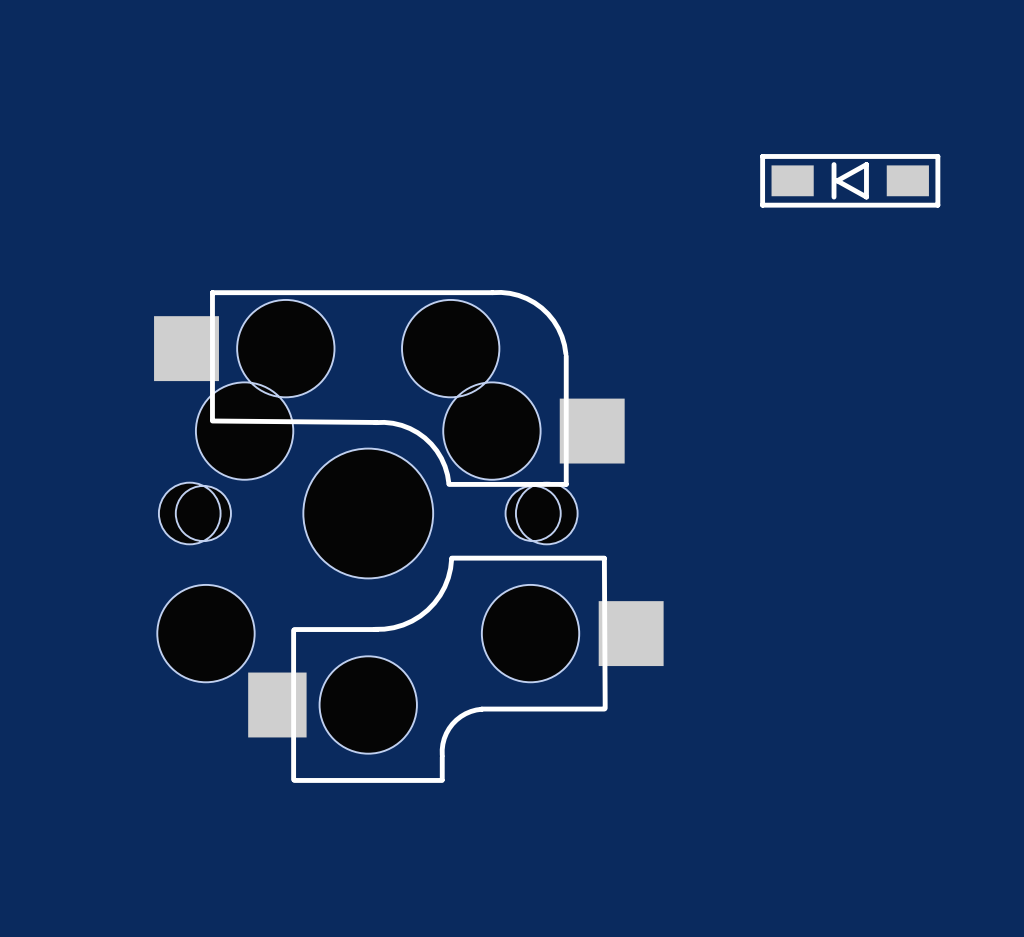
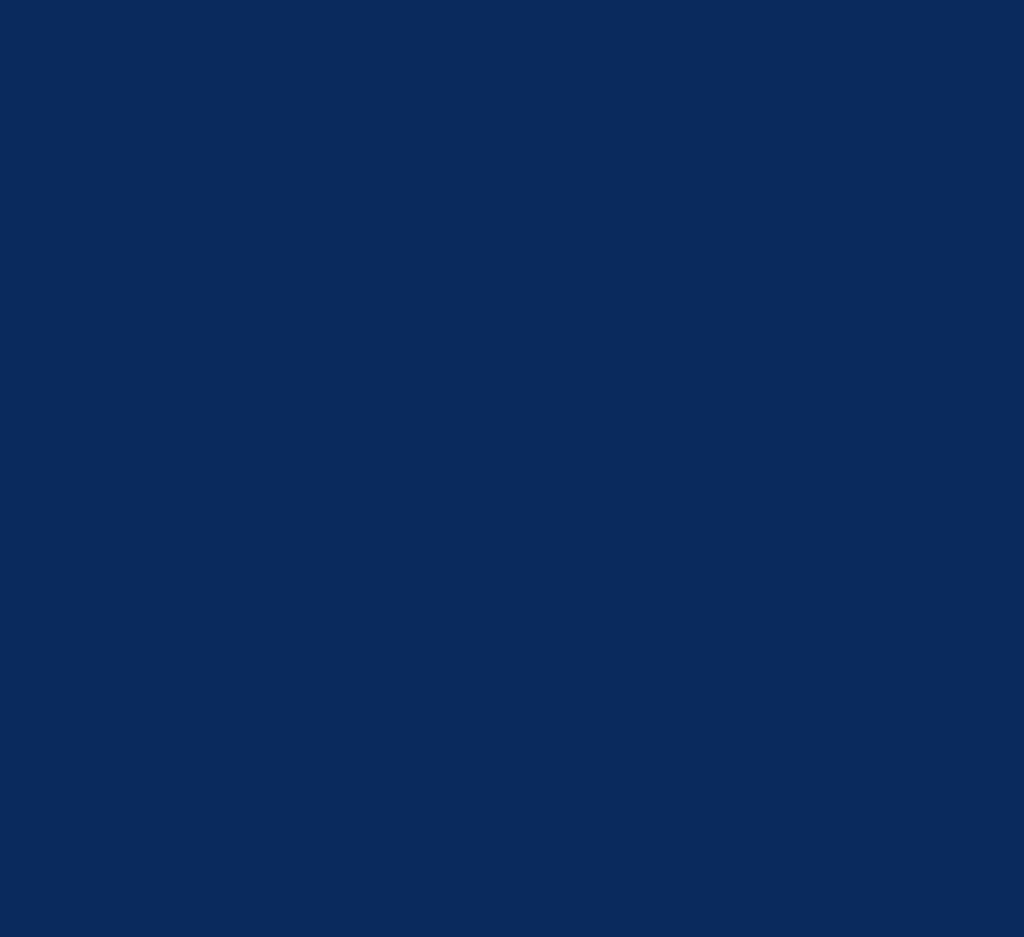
part: (850, 180) -> none
part: (408, 536) -> none

